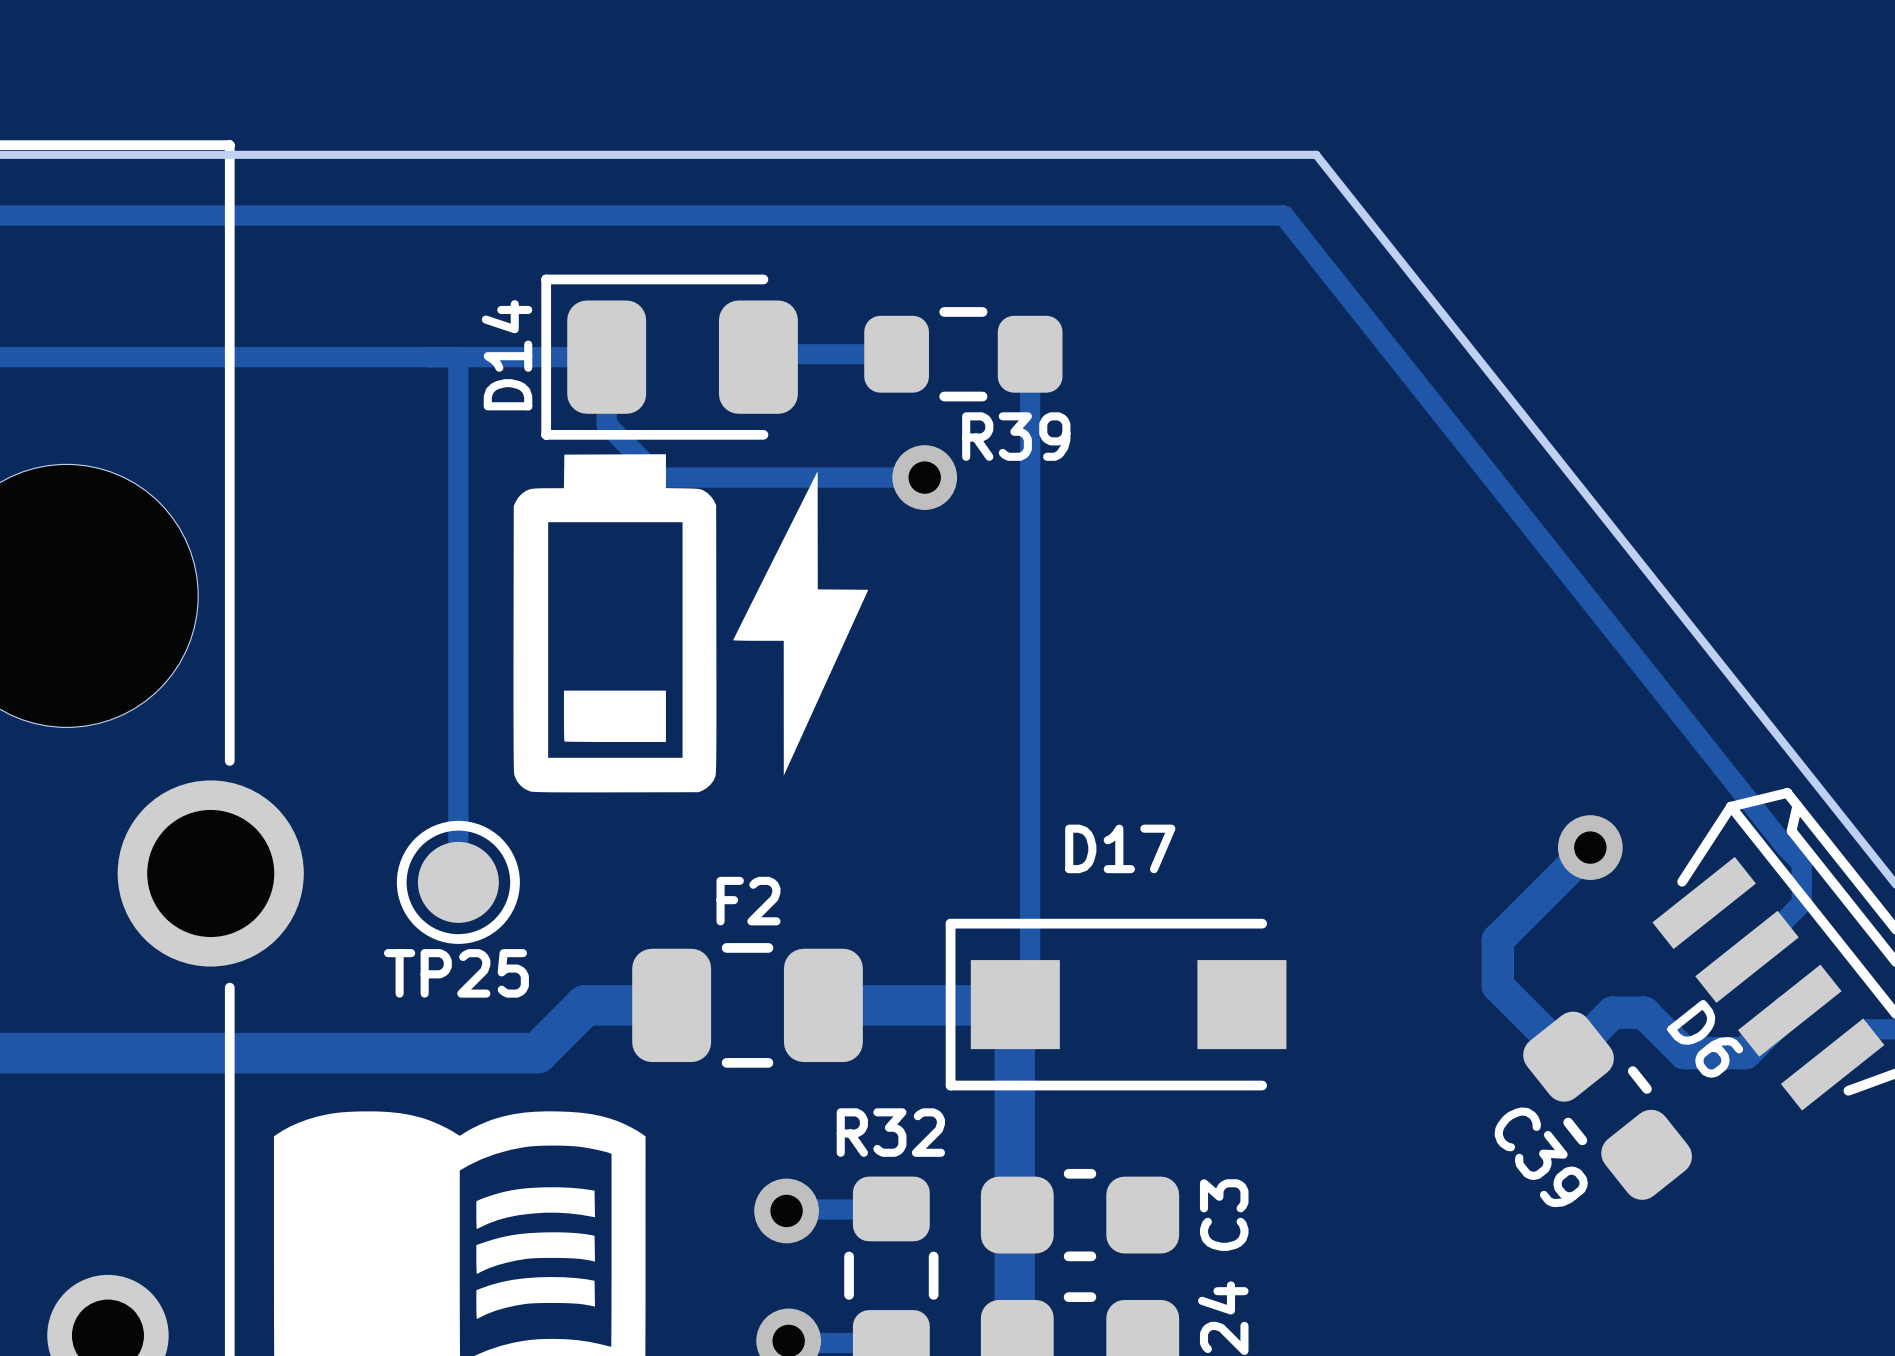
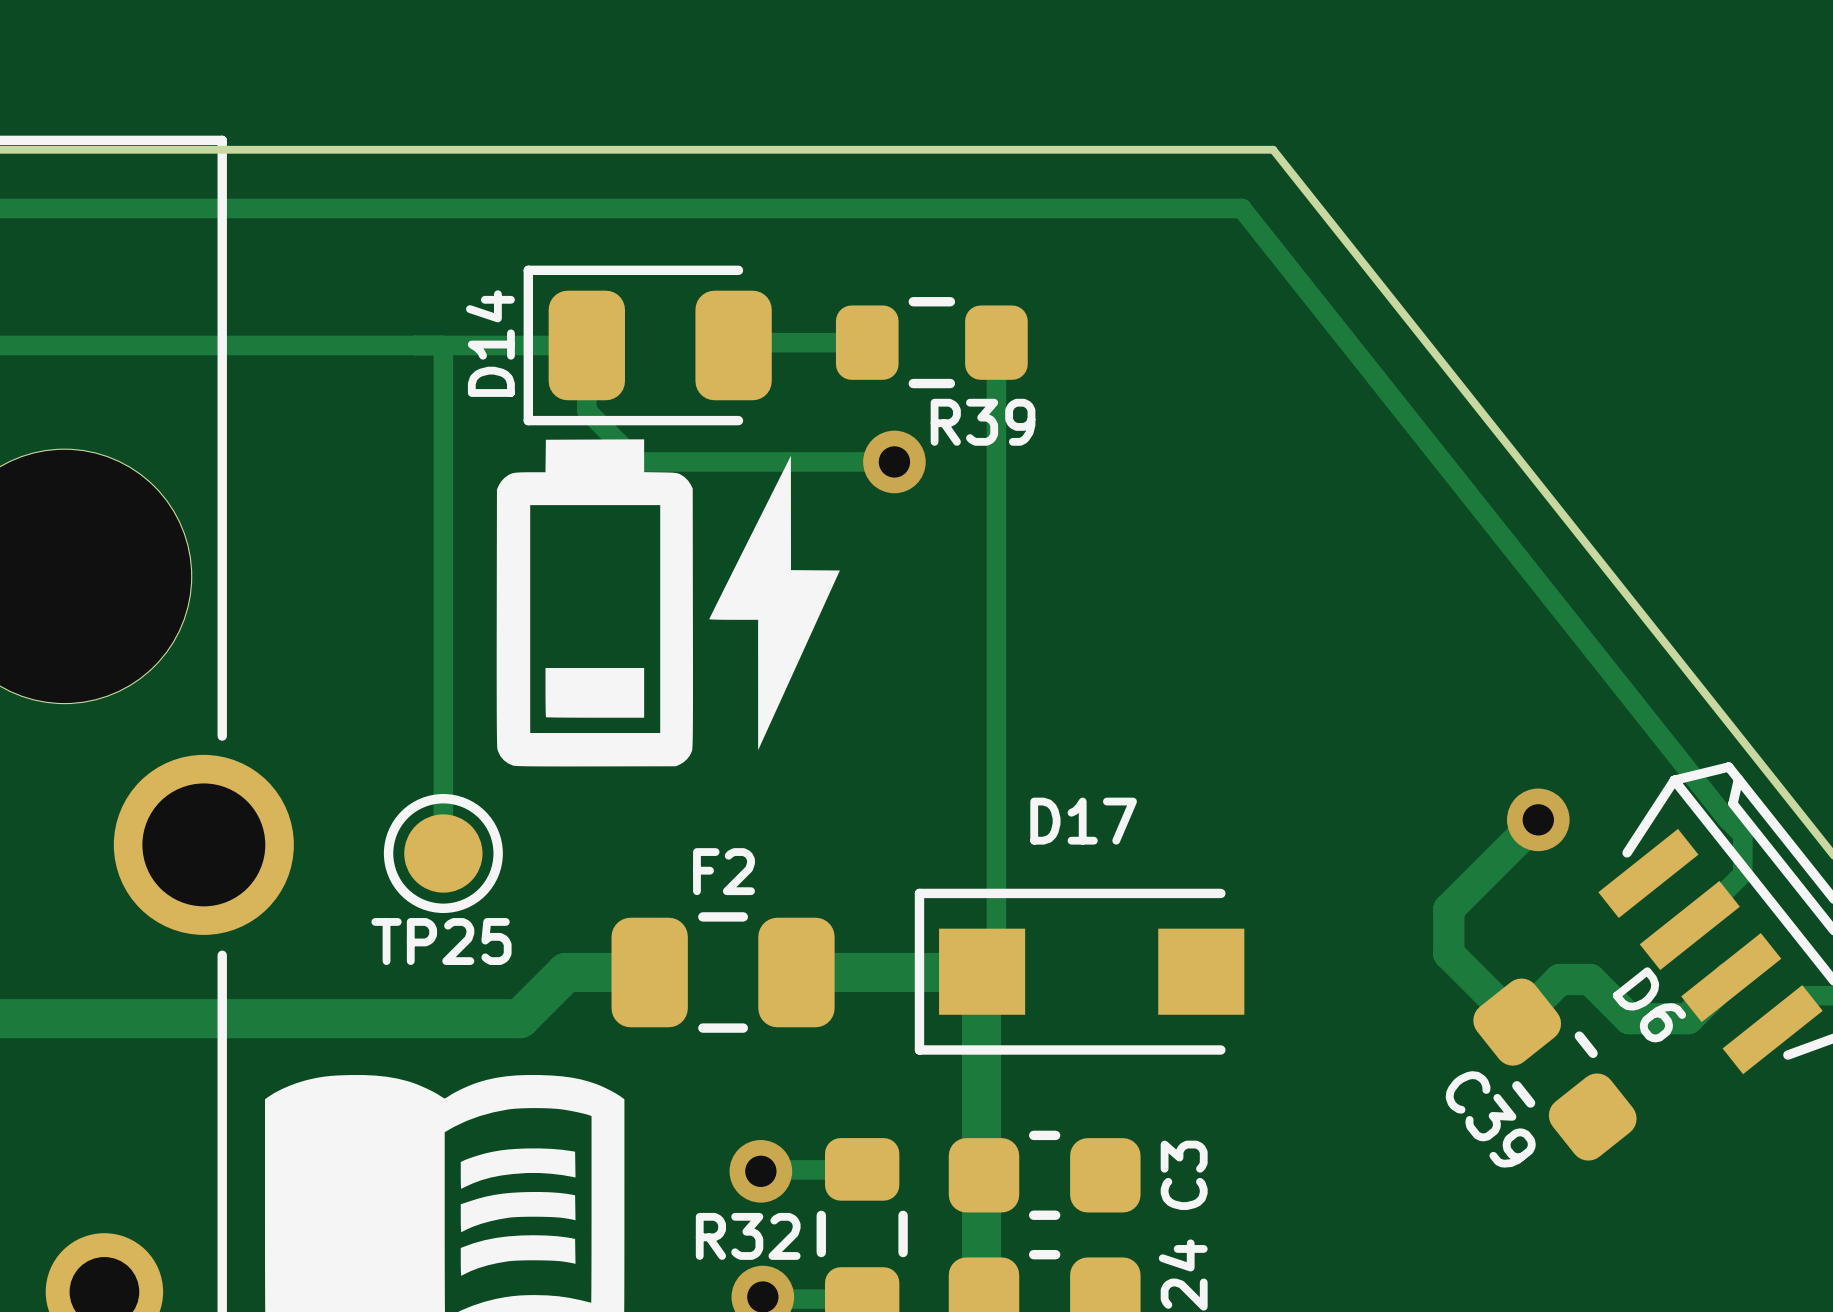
R32 name position: R32 (890, 1132) -> R32 (748, 1236)

